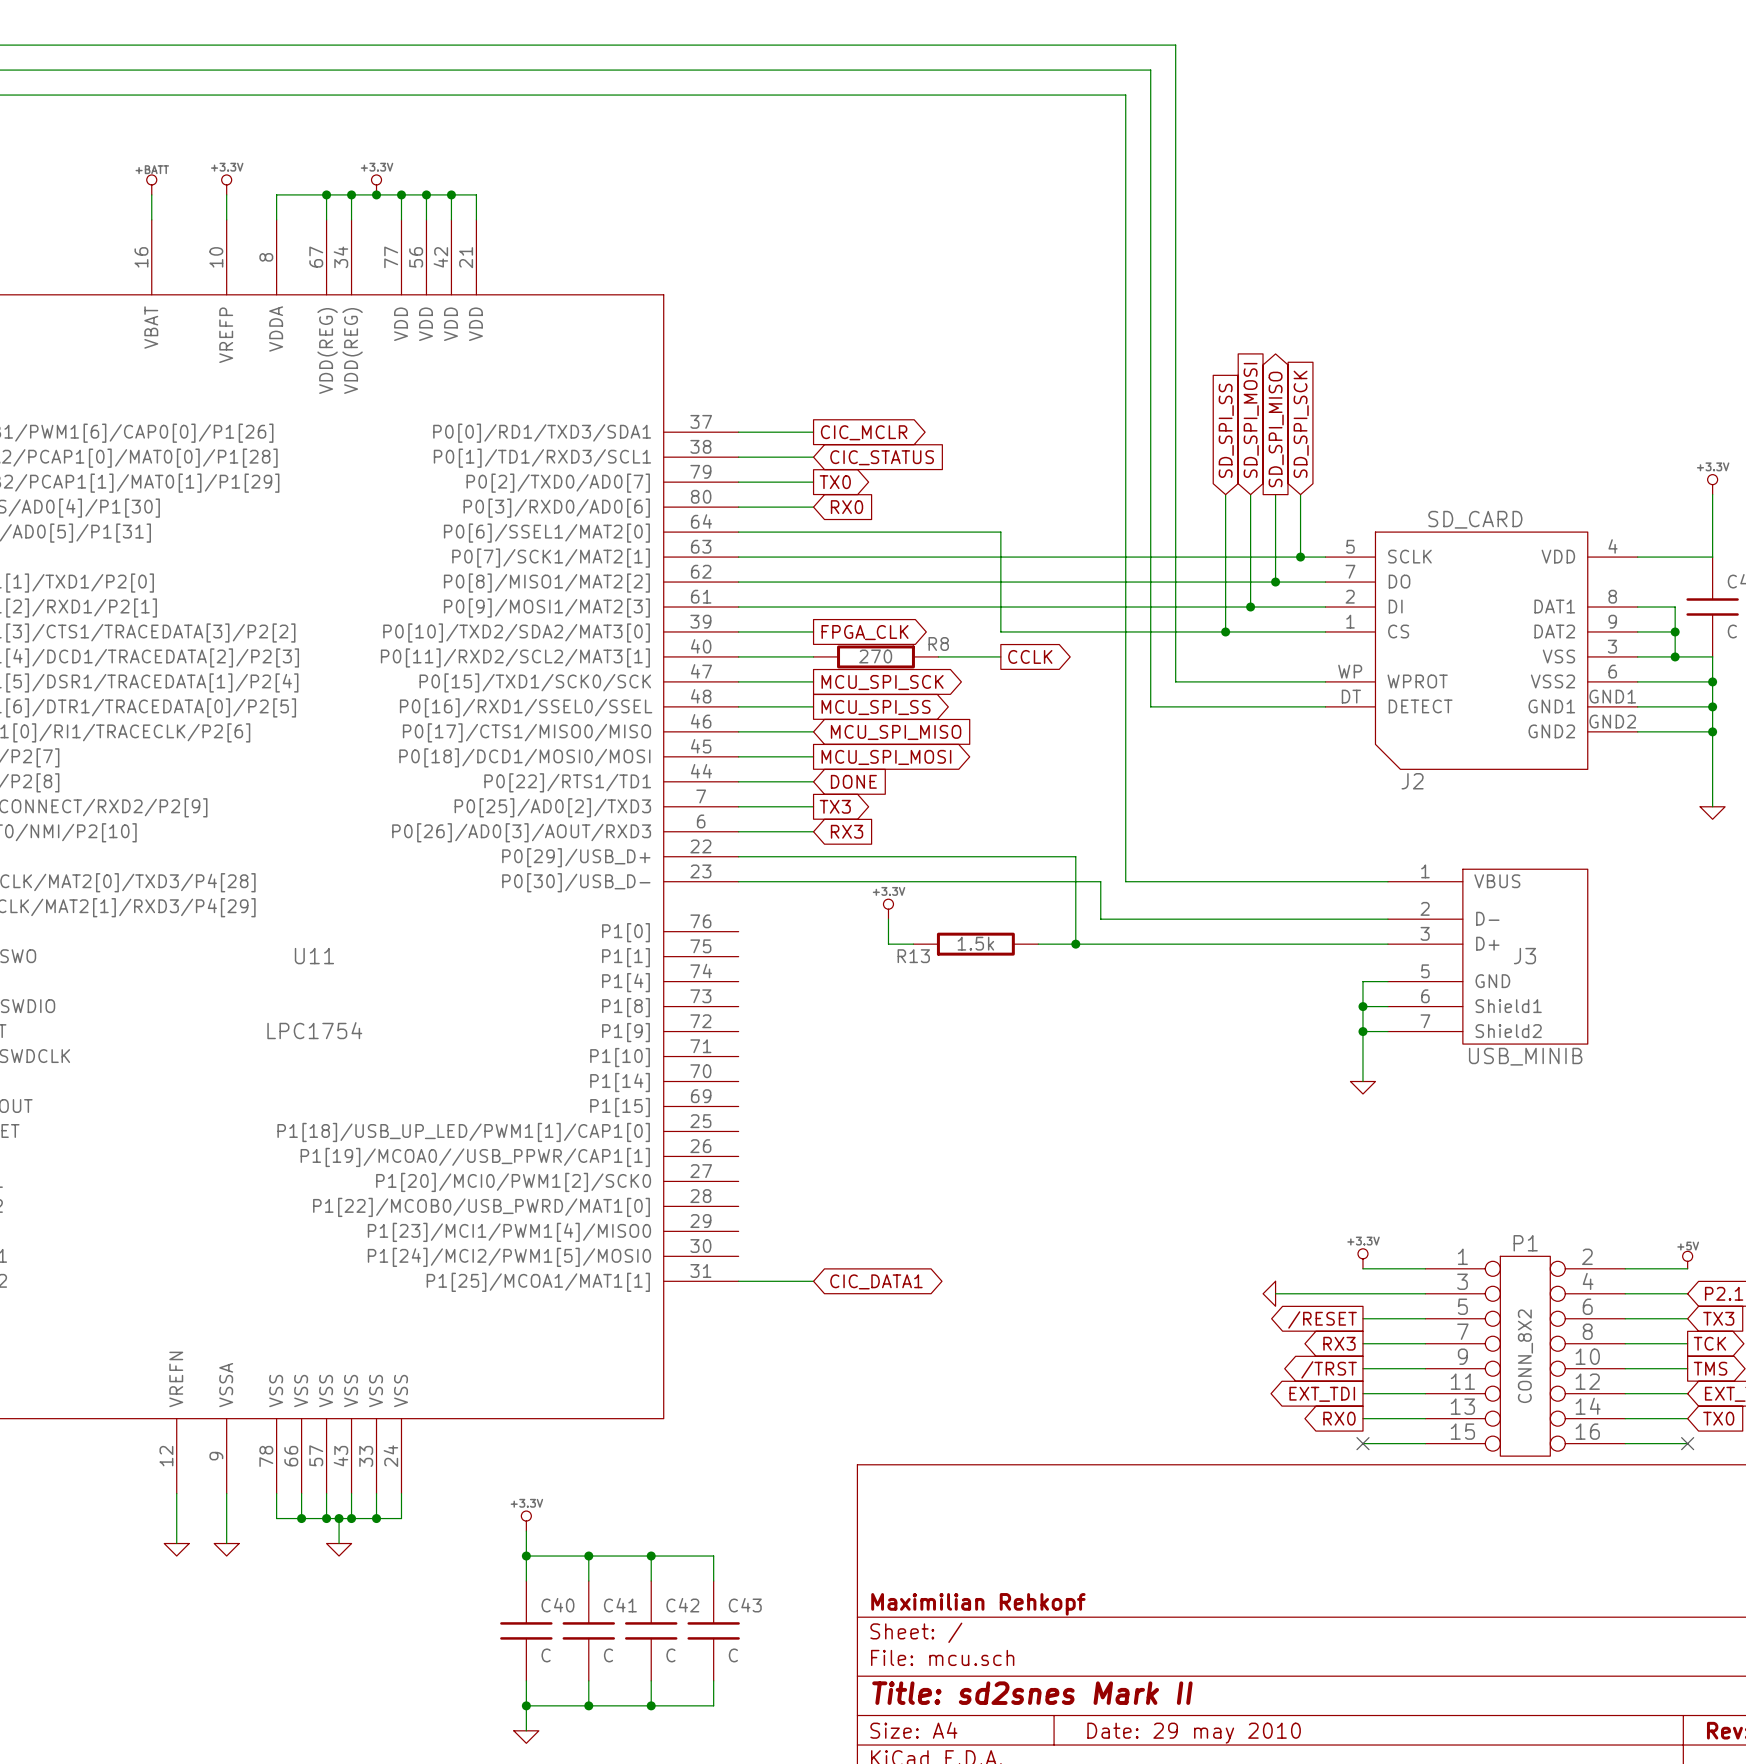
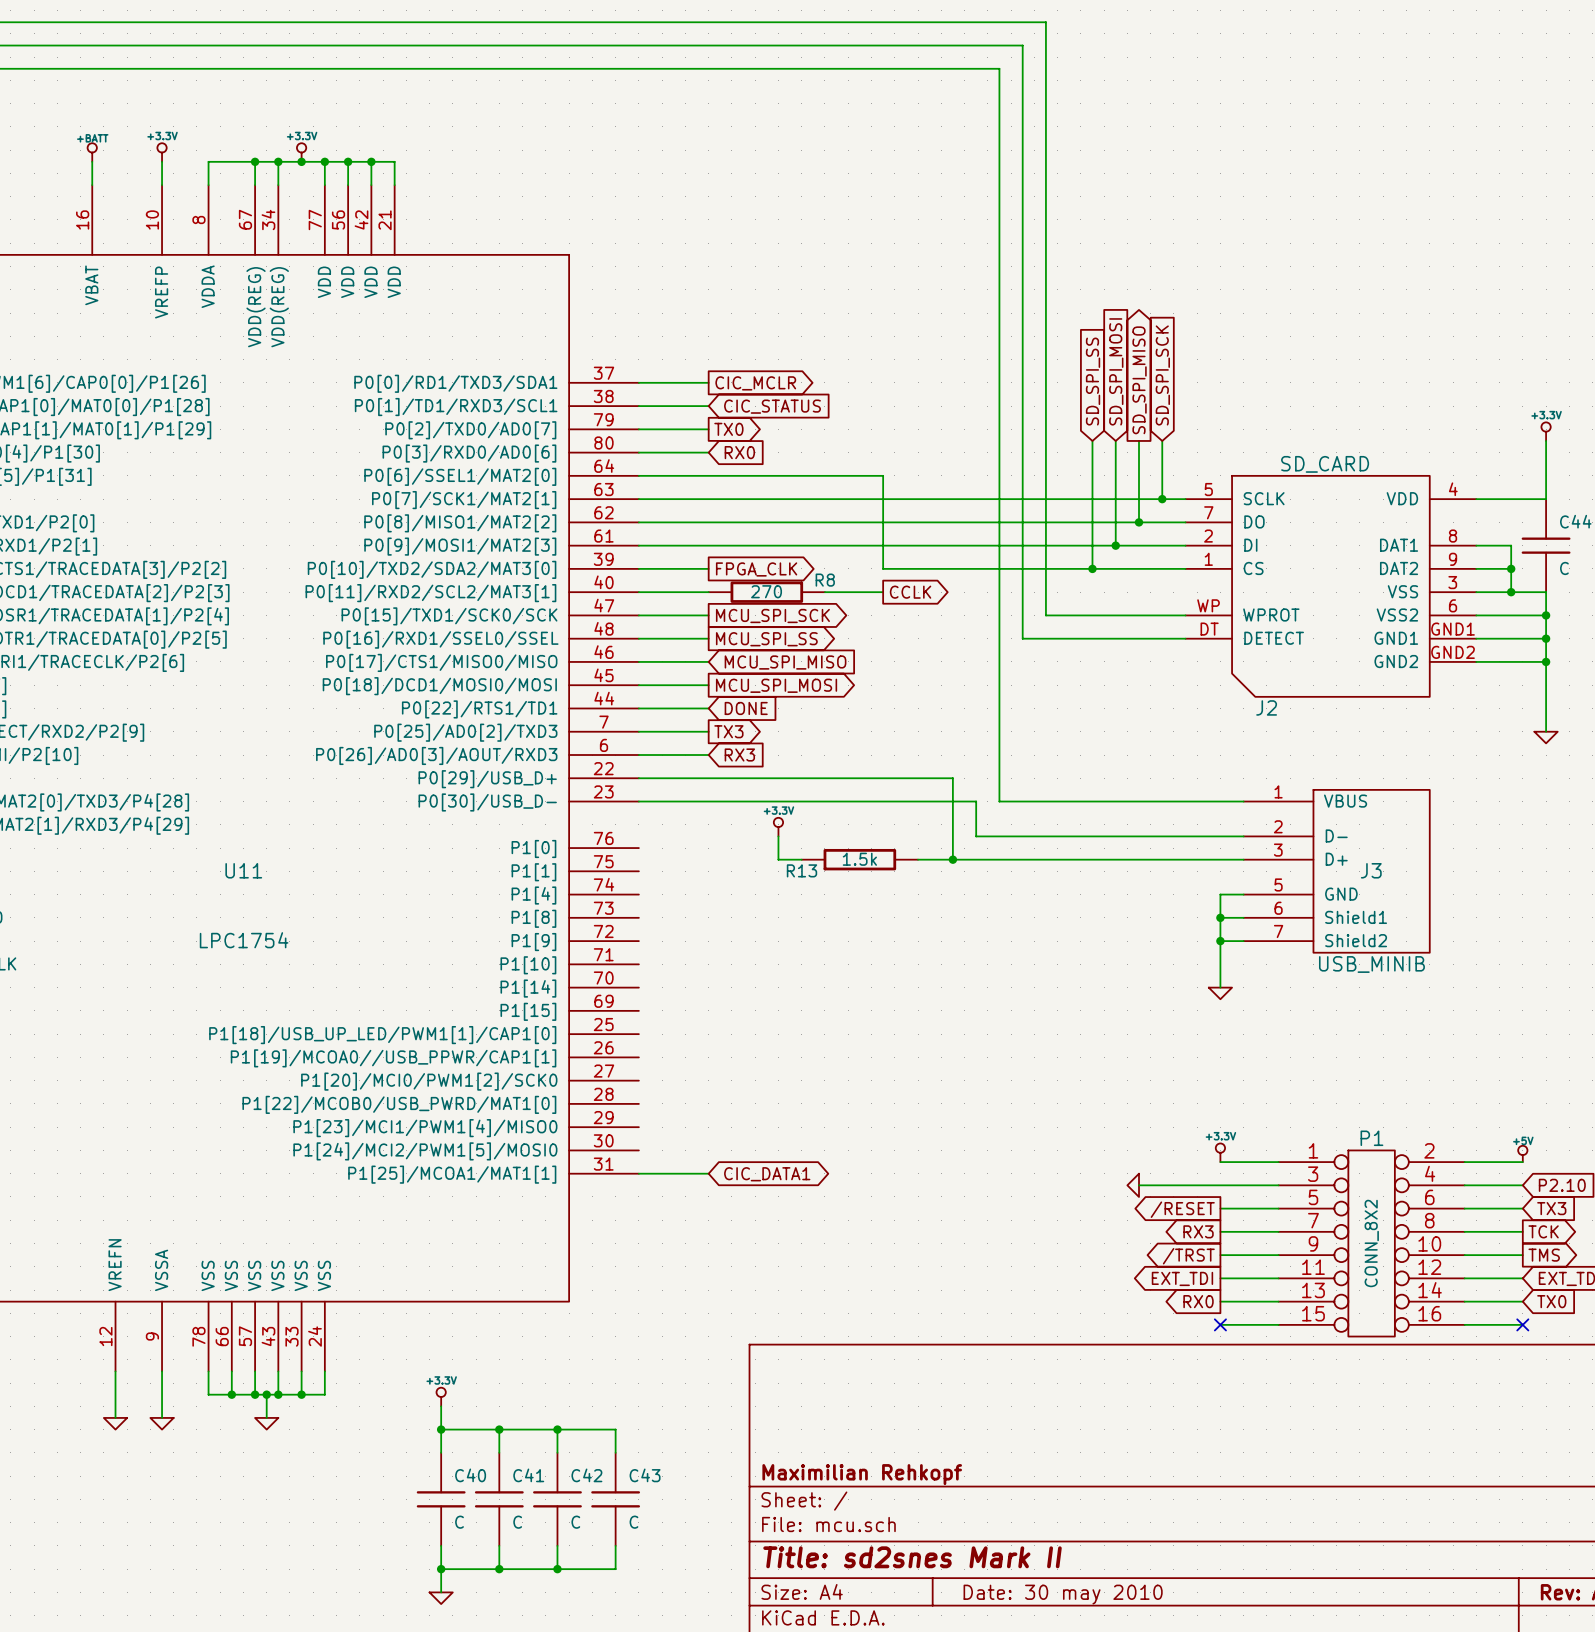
title block: Date: 29 may 2010 (1194, 1733) -> Date: 30 may 2010 (1063, 1594)

